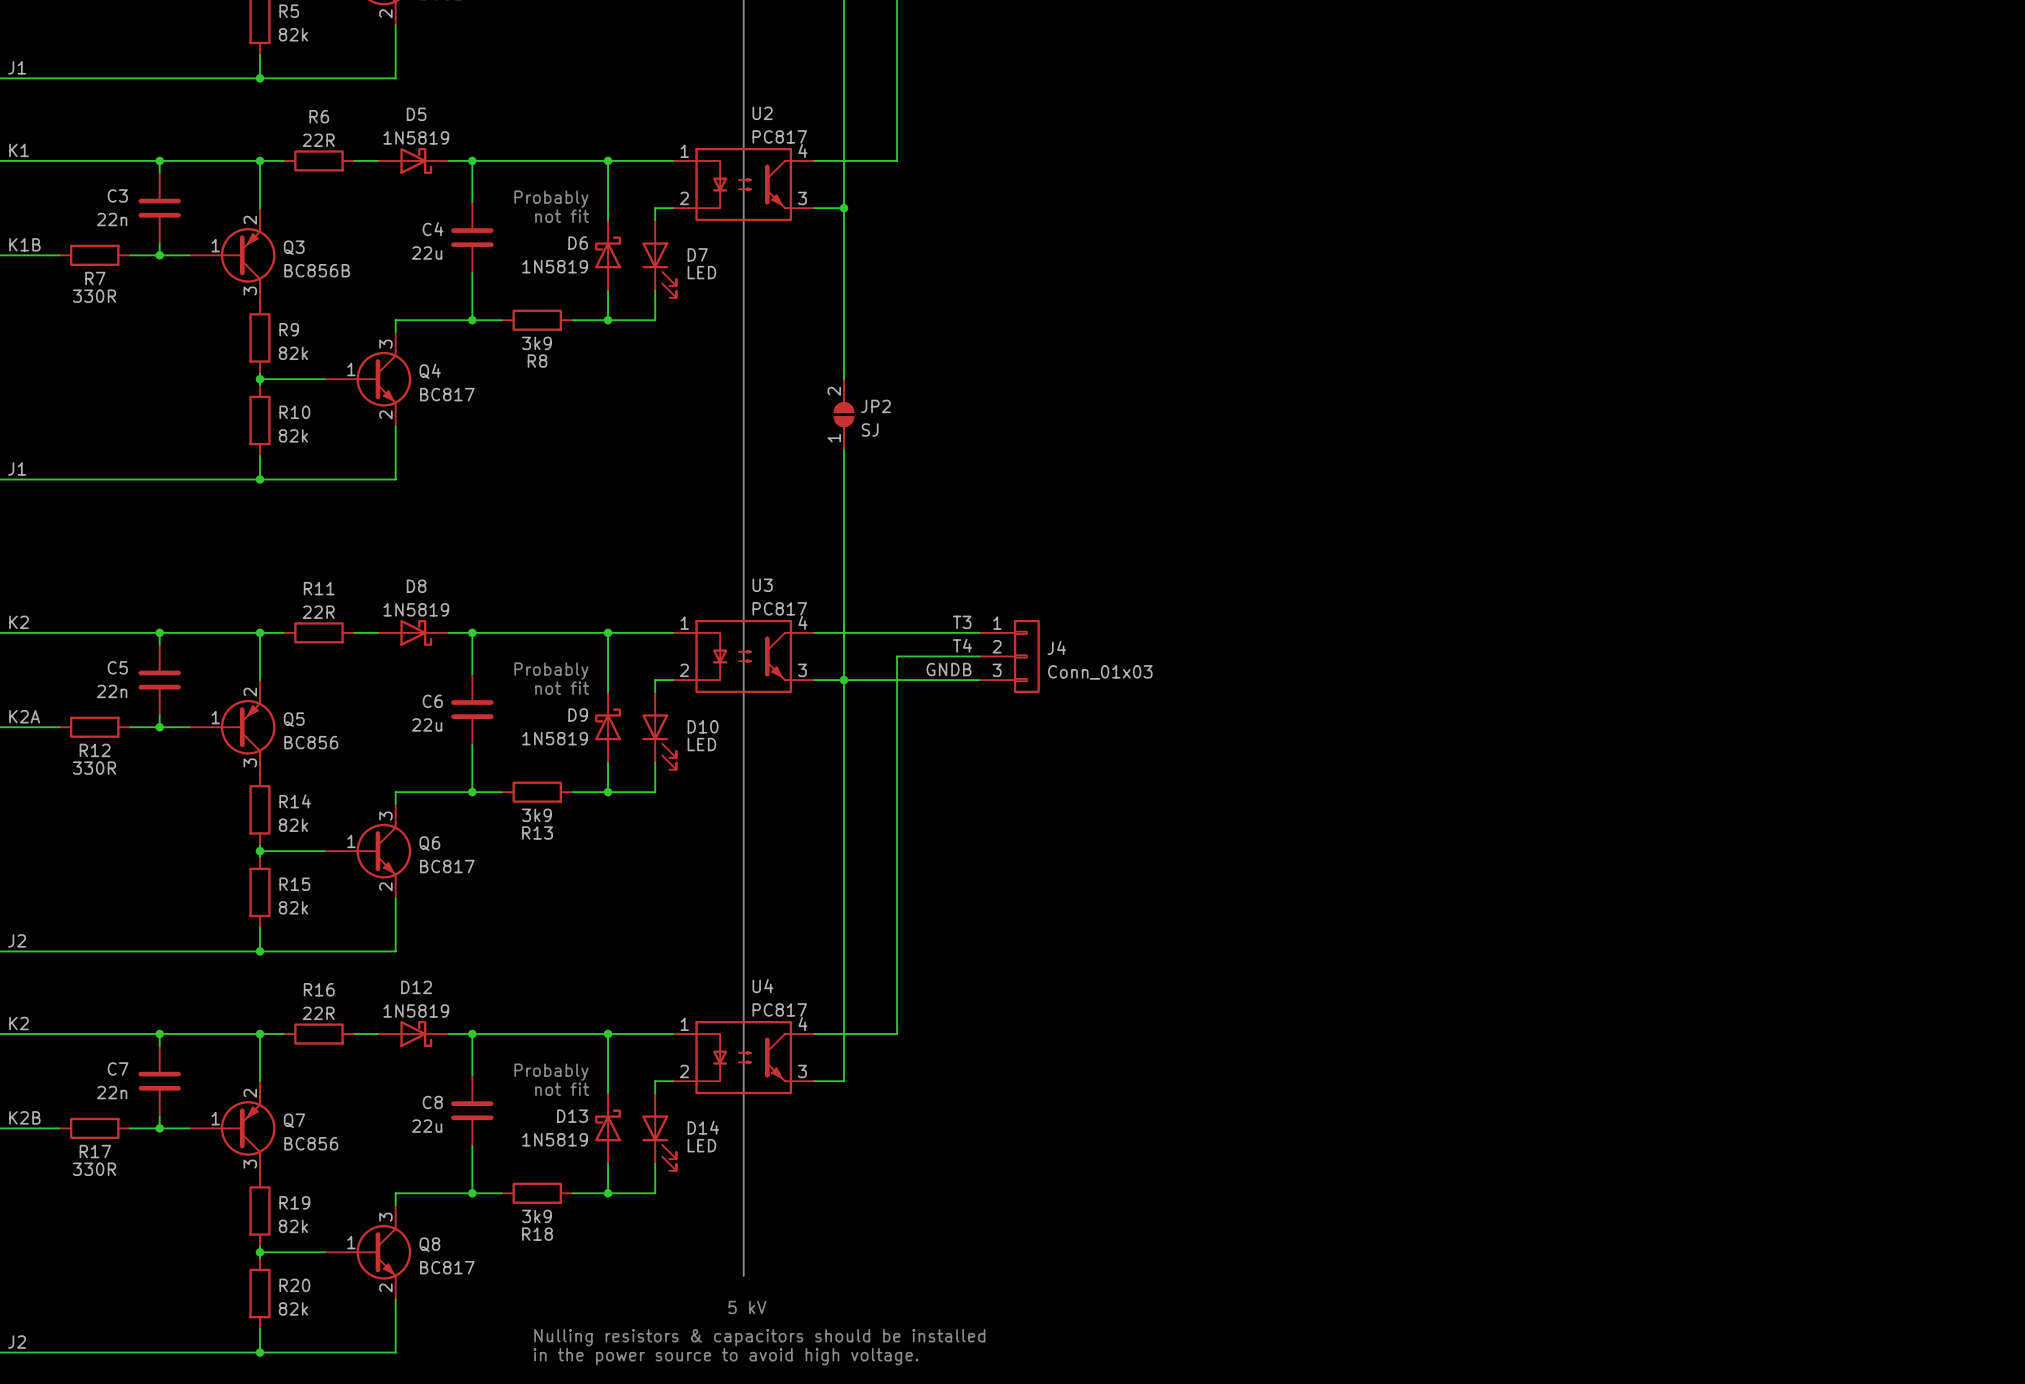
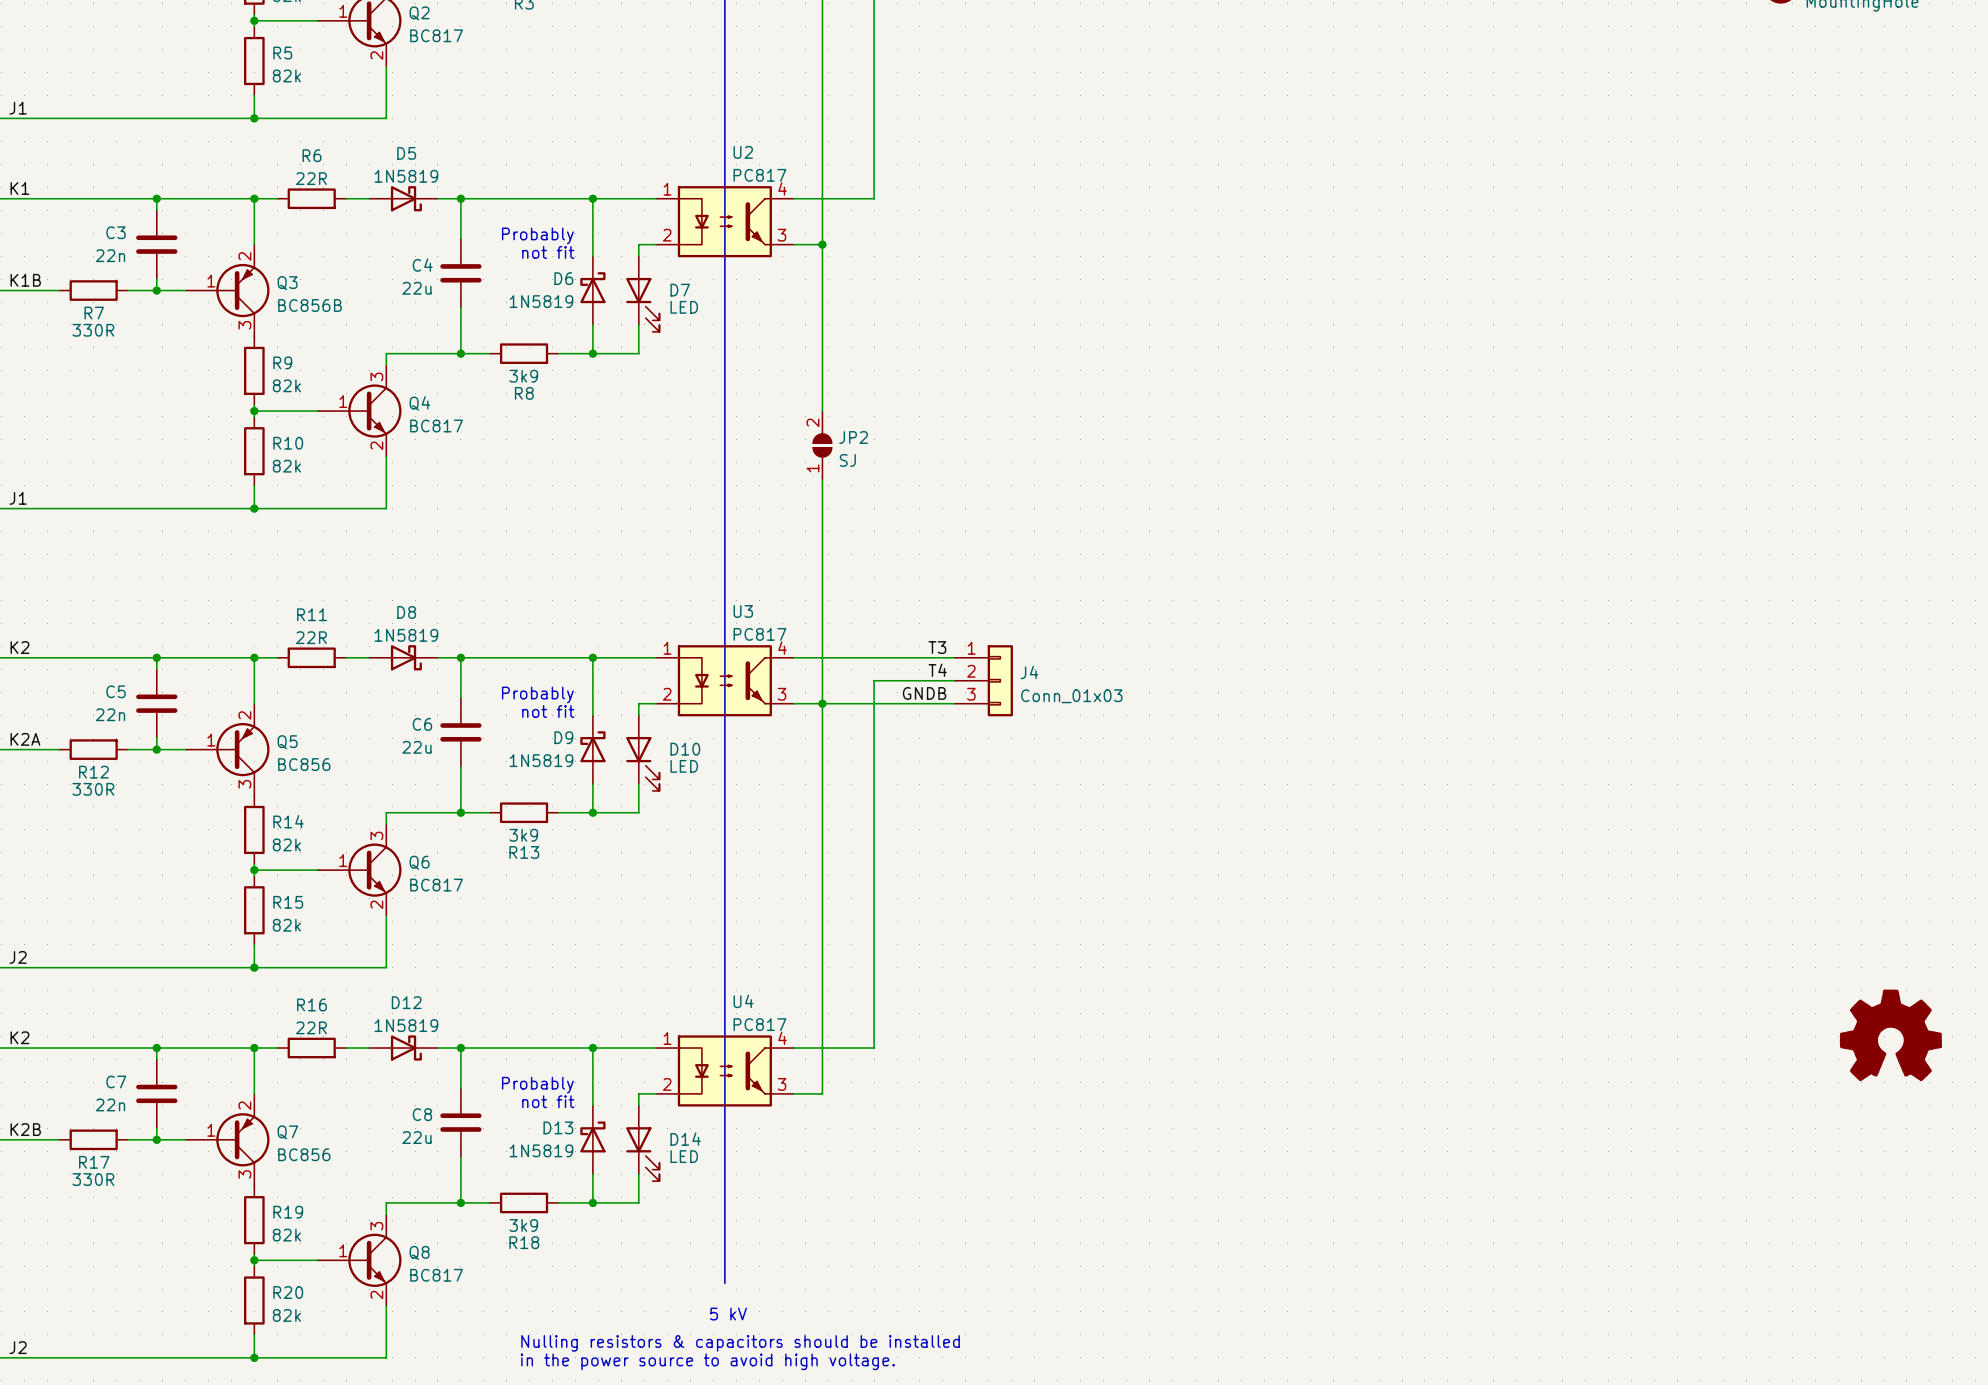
power symbol: none -> (1890, 1035)

